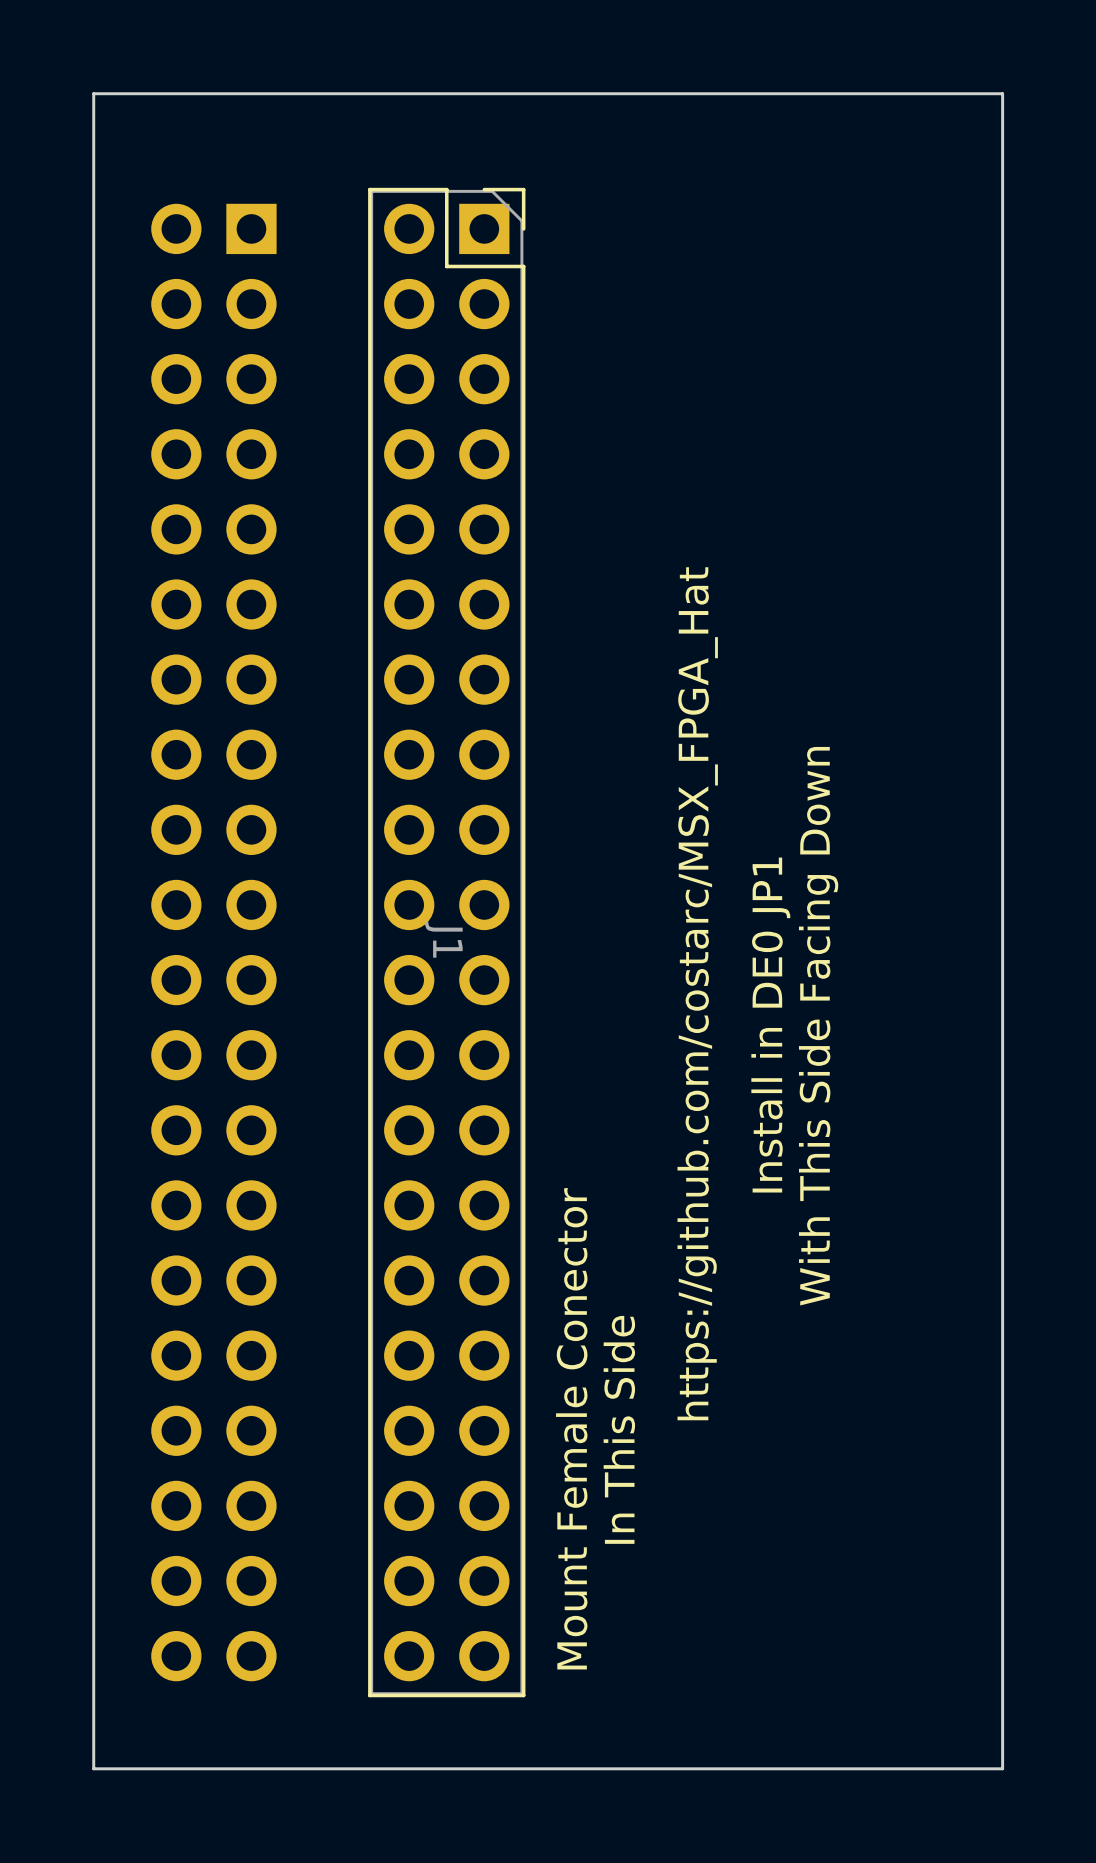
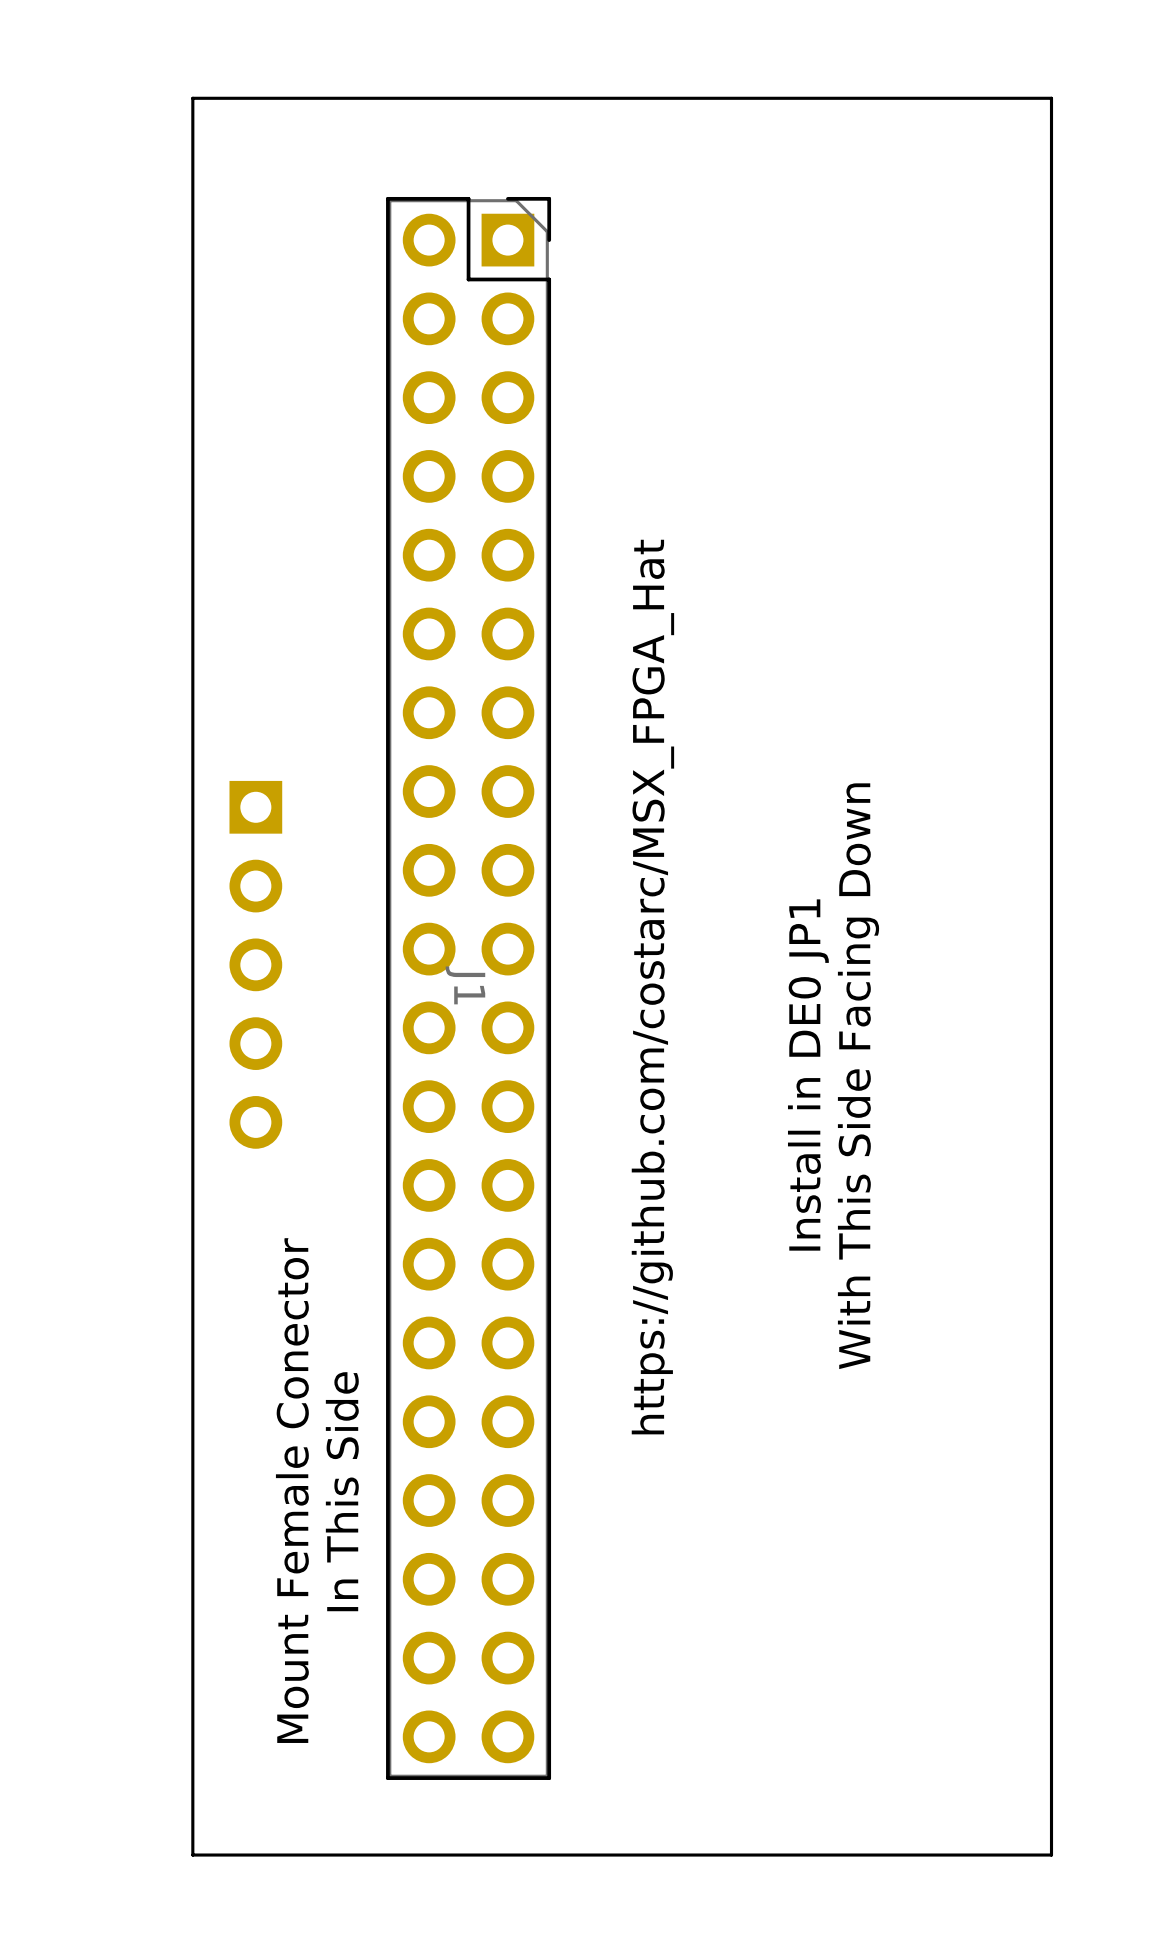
board edge: (183, 93) (93, 93) (93, 1768) (183, 1768) -> (192, 98) (192, 1855)
part: none -> (255, 964)
part: (213, 942) -> none
text position: https://github.com/costarc/MSX_FPGA_Hat (697, 993) -> https://github.com/costarc/MSX_FPGA_Hat (652, 987)
text position: Mount Female Conector (571, 1428) -> Mount Female Conector (292, 1490)
text position: In This Side (619, 1429) -> In This Side (342, 1491)

